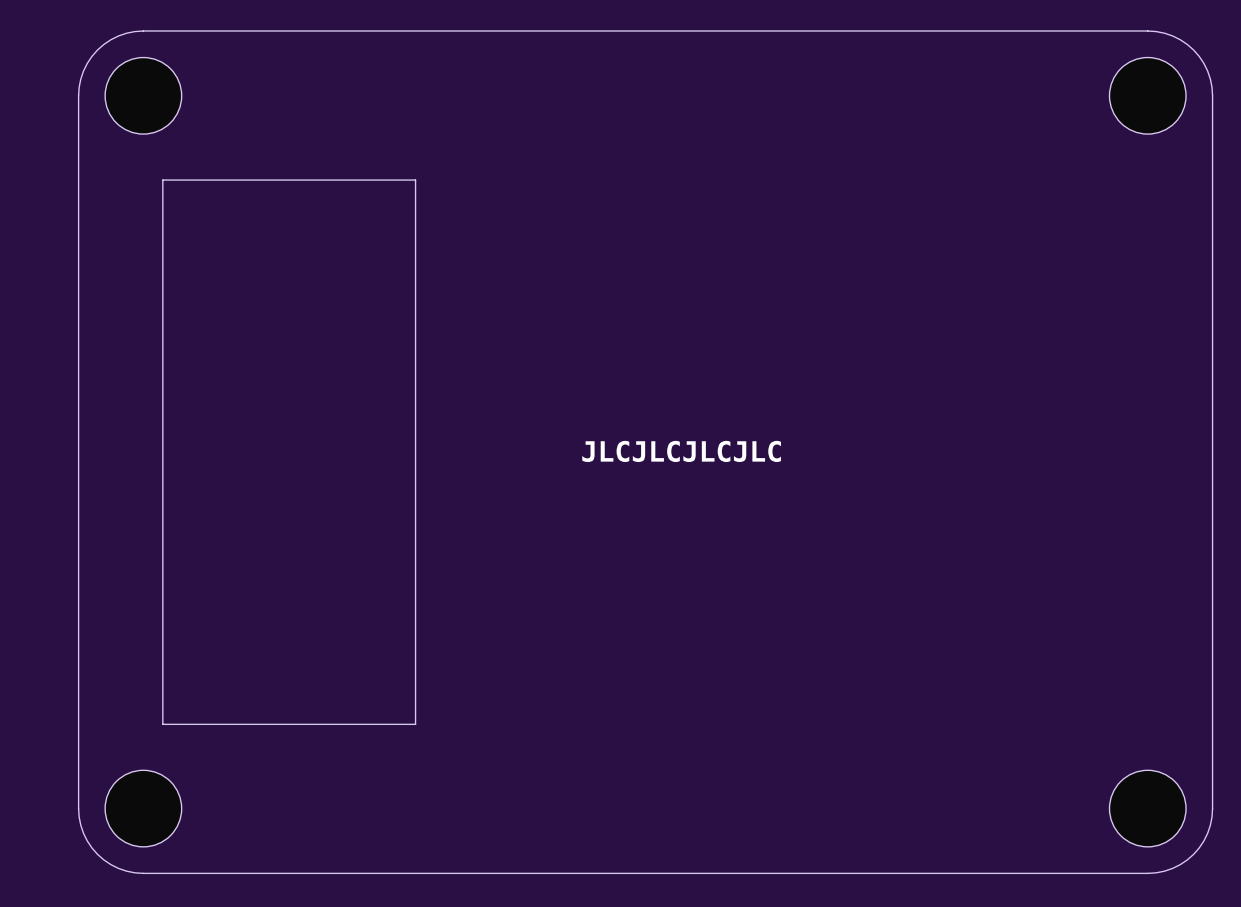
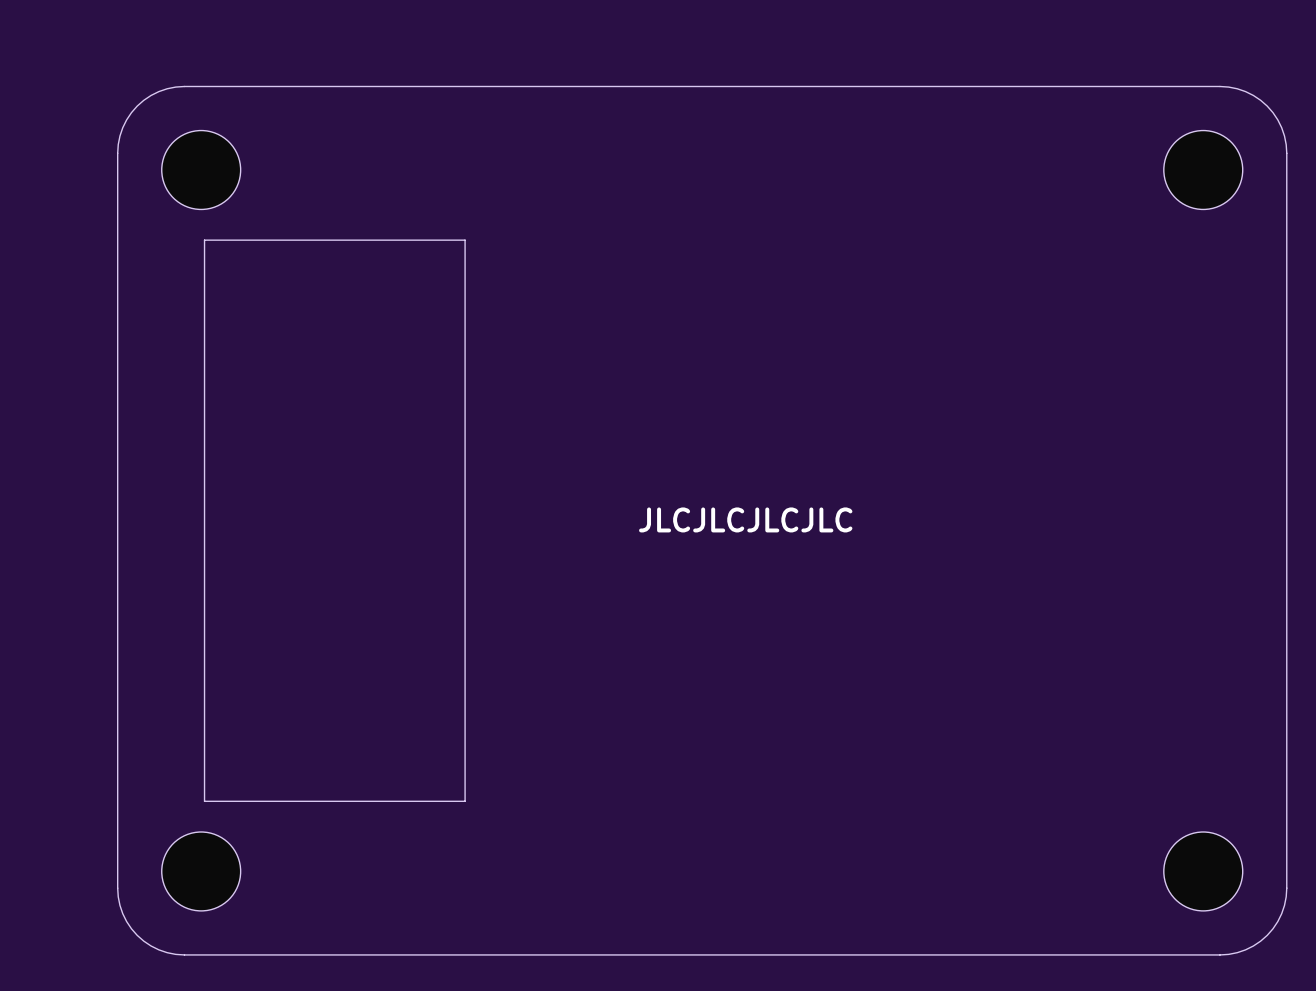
part footprint: [77, 30, 1214, 875] -> [117, 85, 1288, 956]

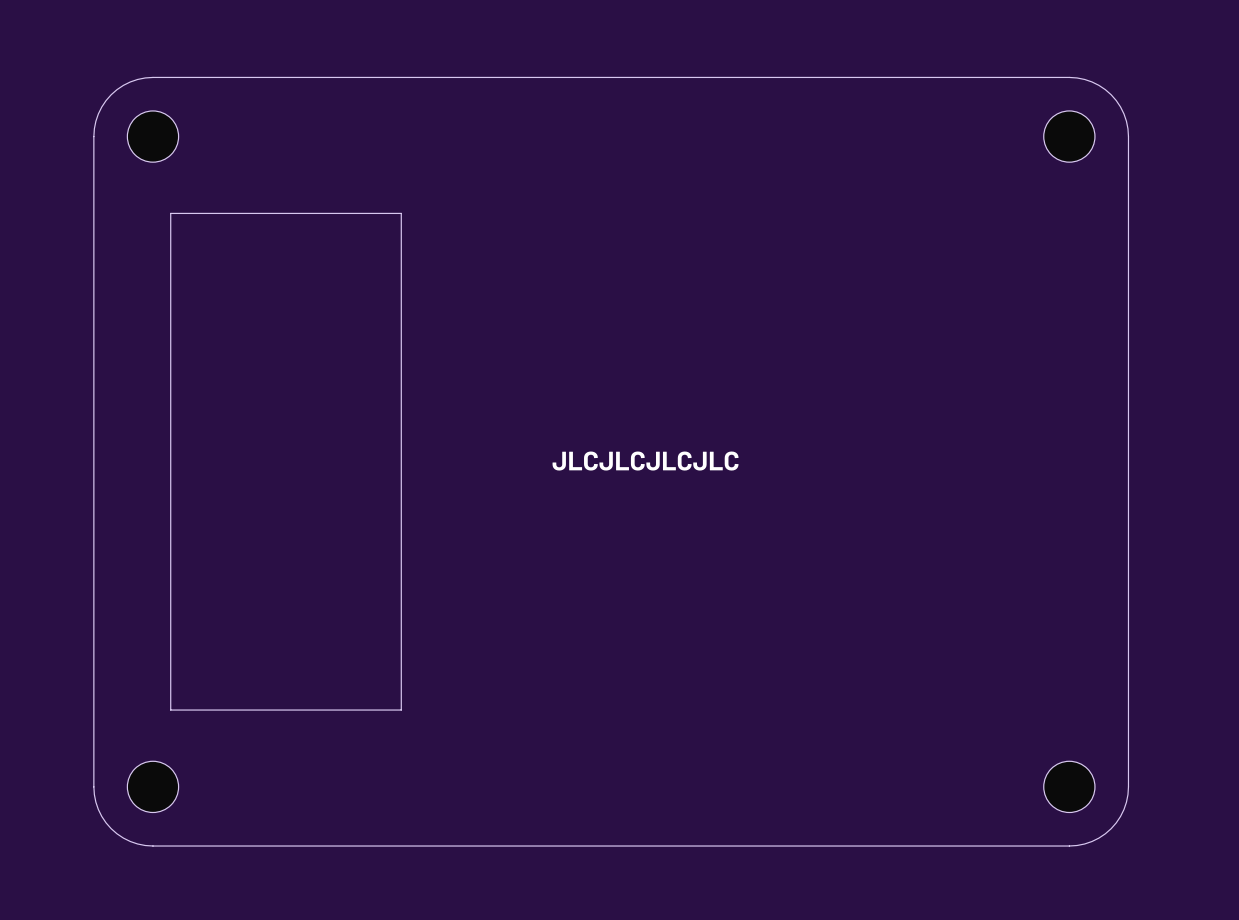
part: none -> (152, 136)
part: none -> (1069, 136)
part: (702, 520) -> none
part: none -> (152, 786)
part: none -> (1069, 786)

